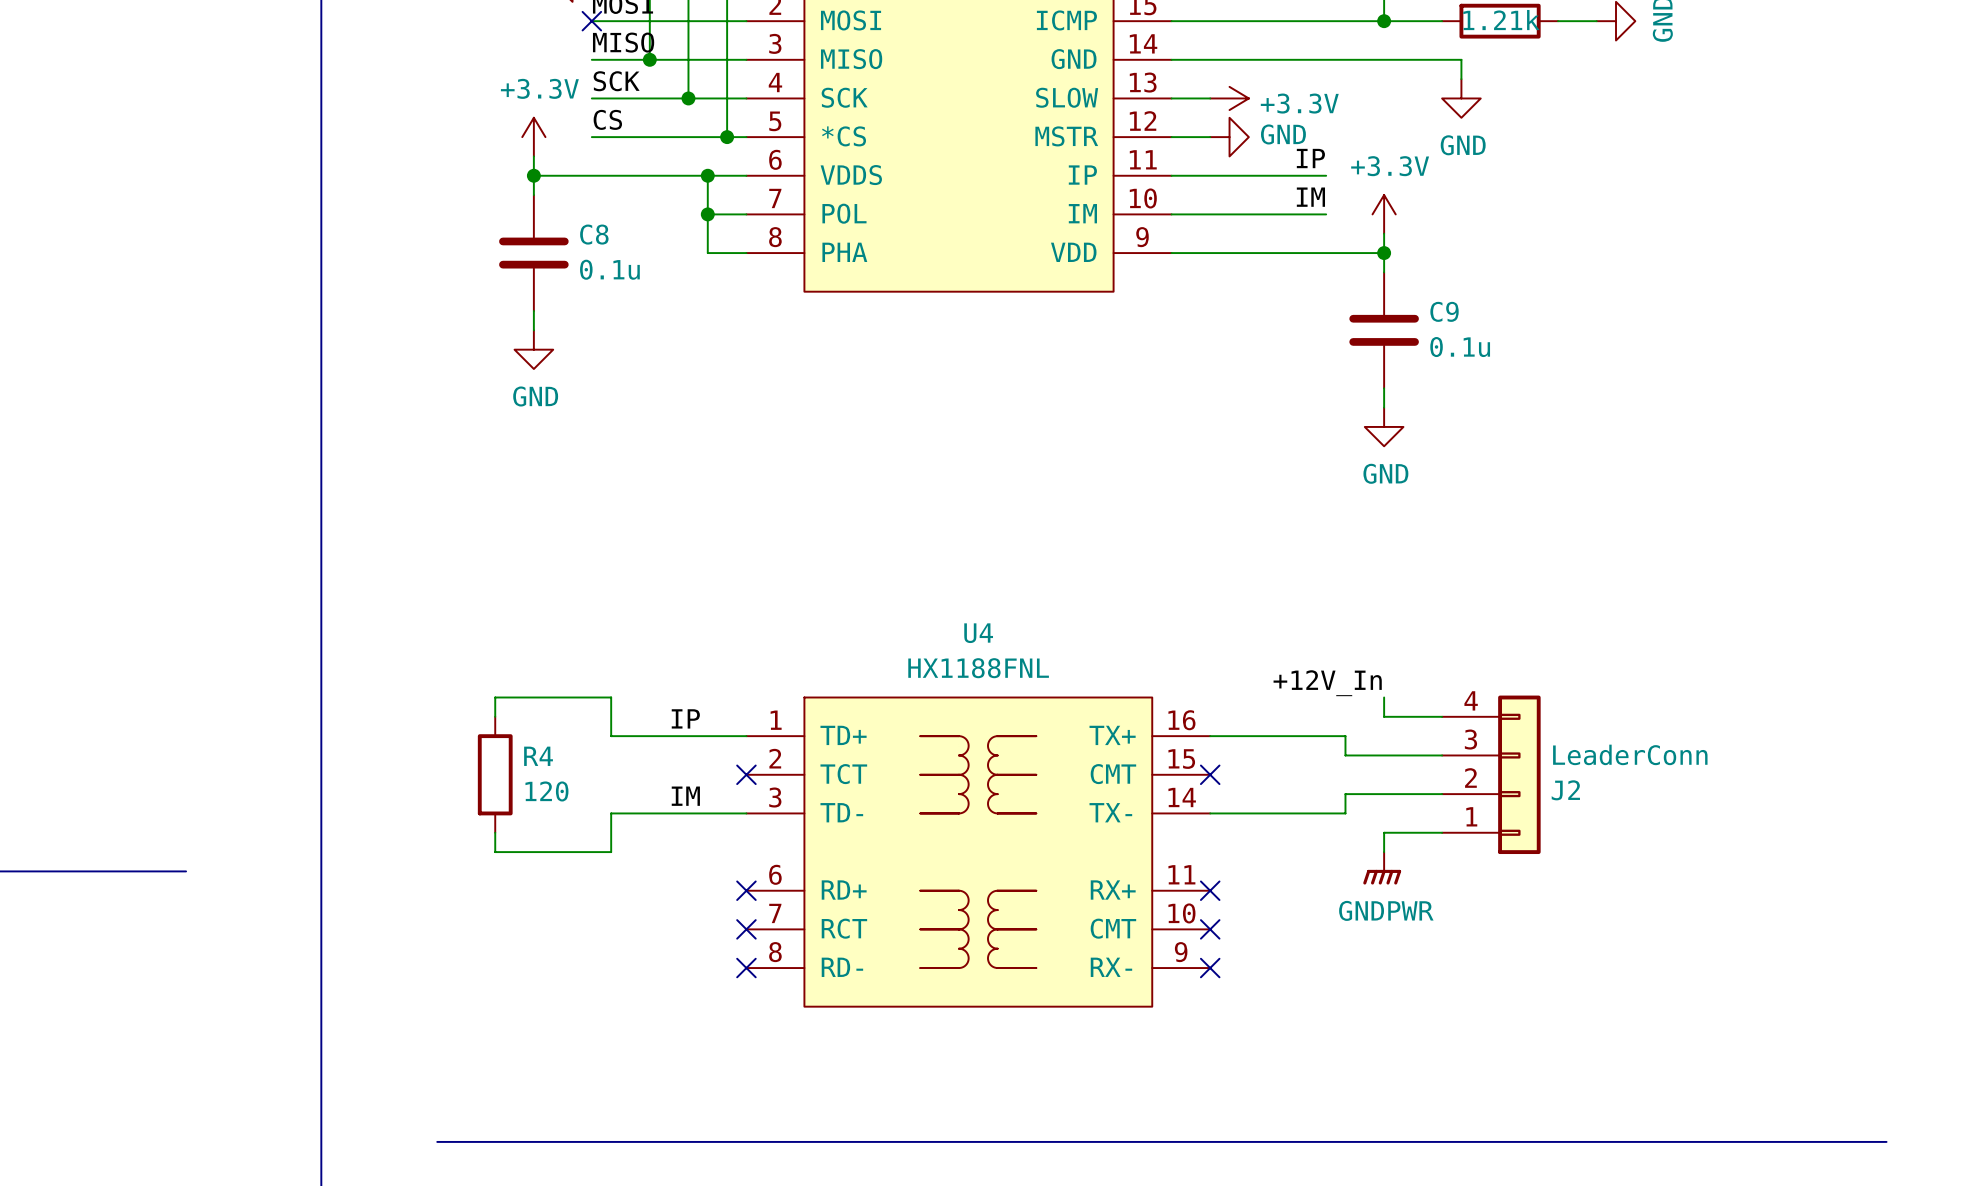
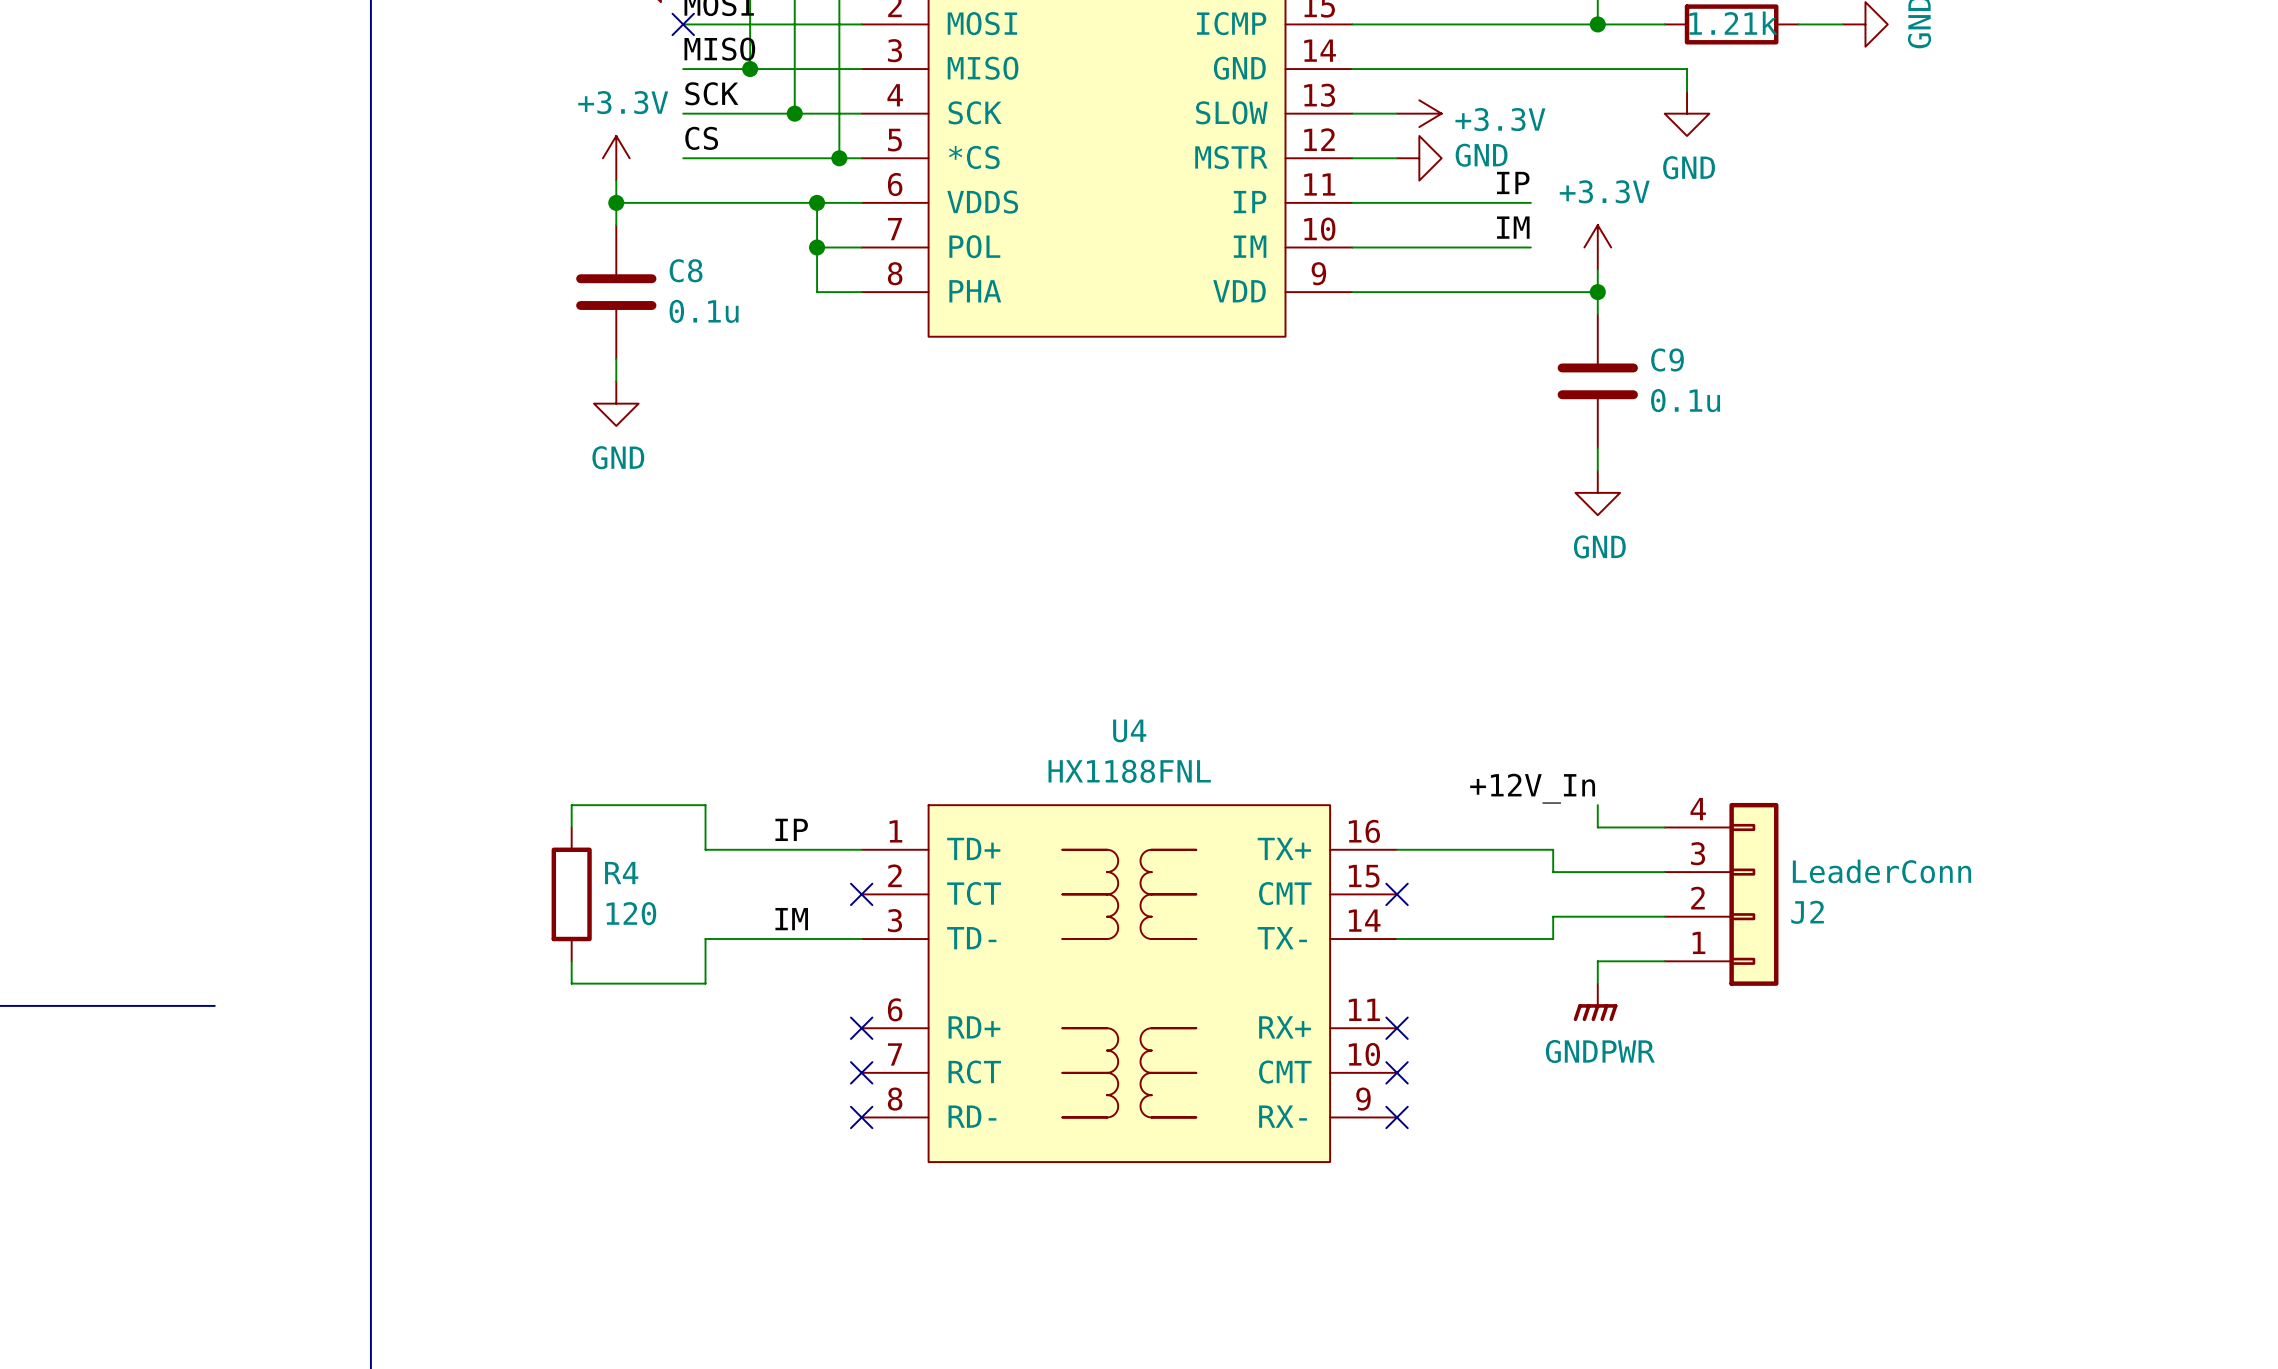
line: (437, 1141) (1886, 1141) -> none

